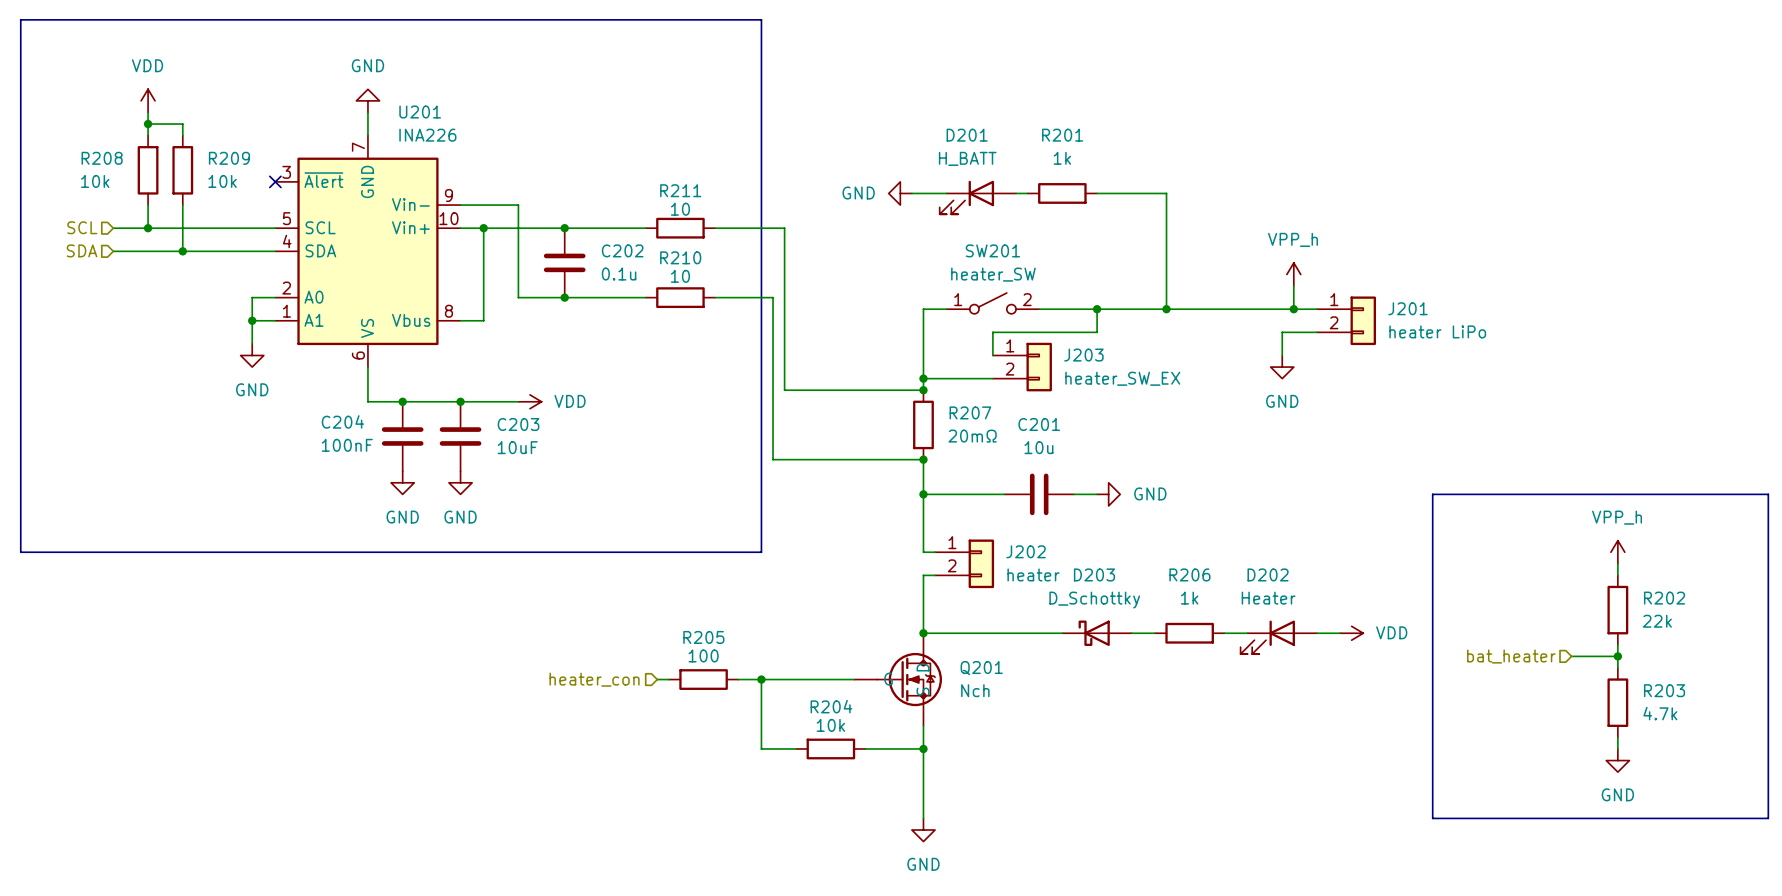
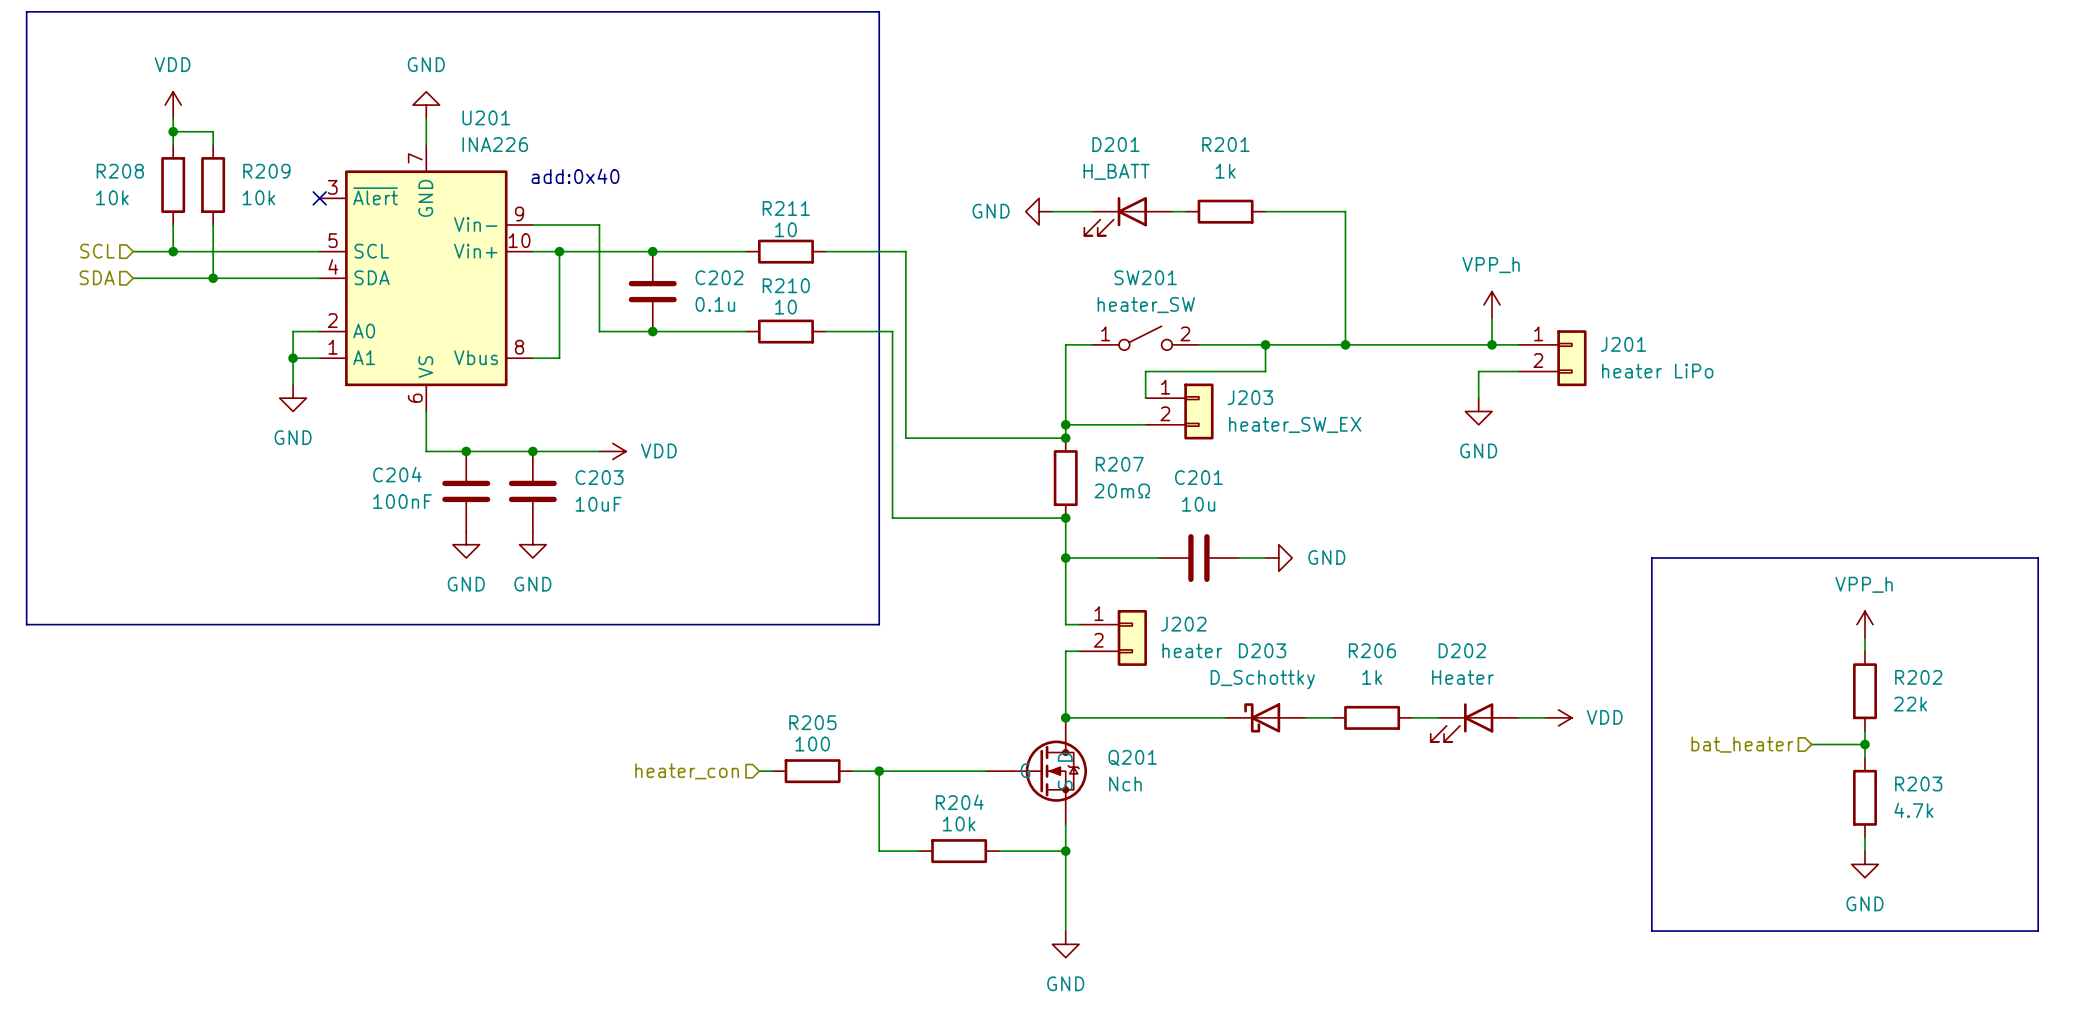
text: none -> add:0x40 (575, 176)

